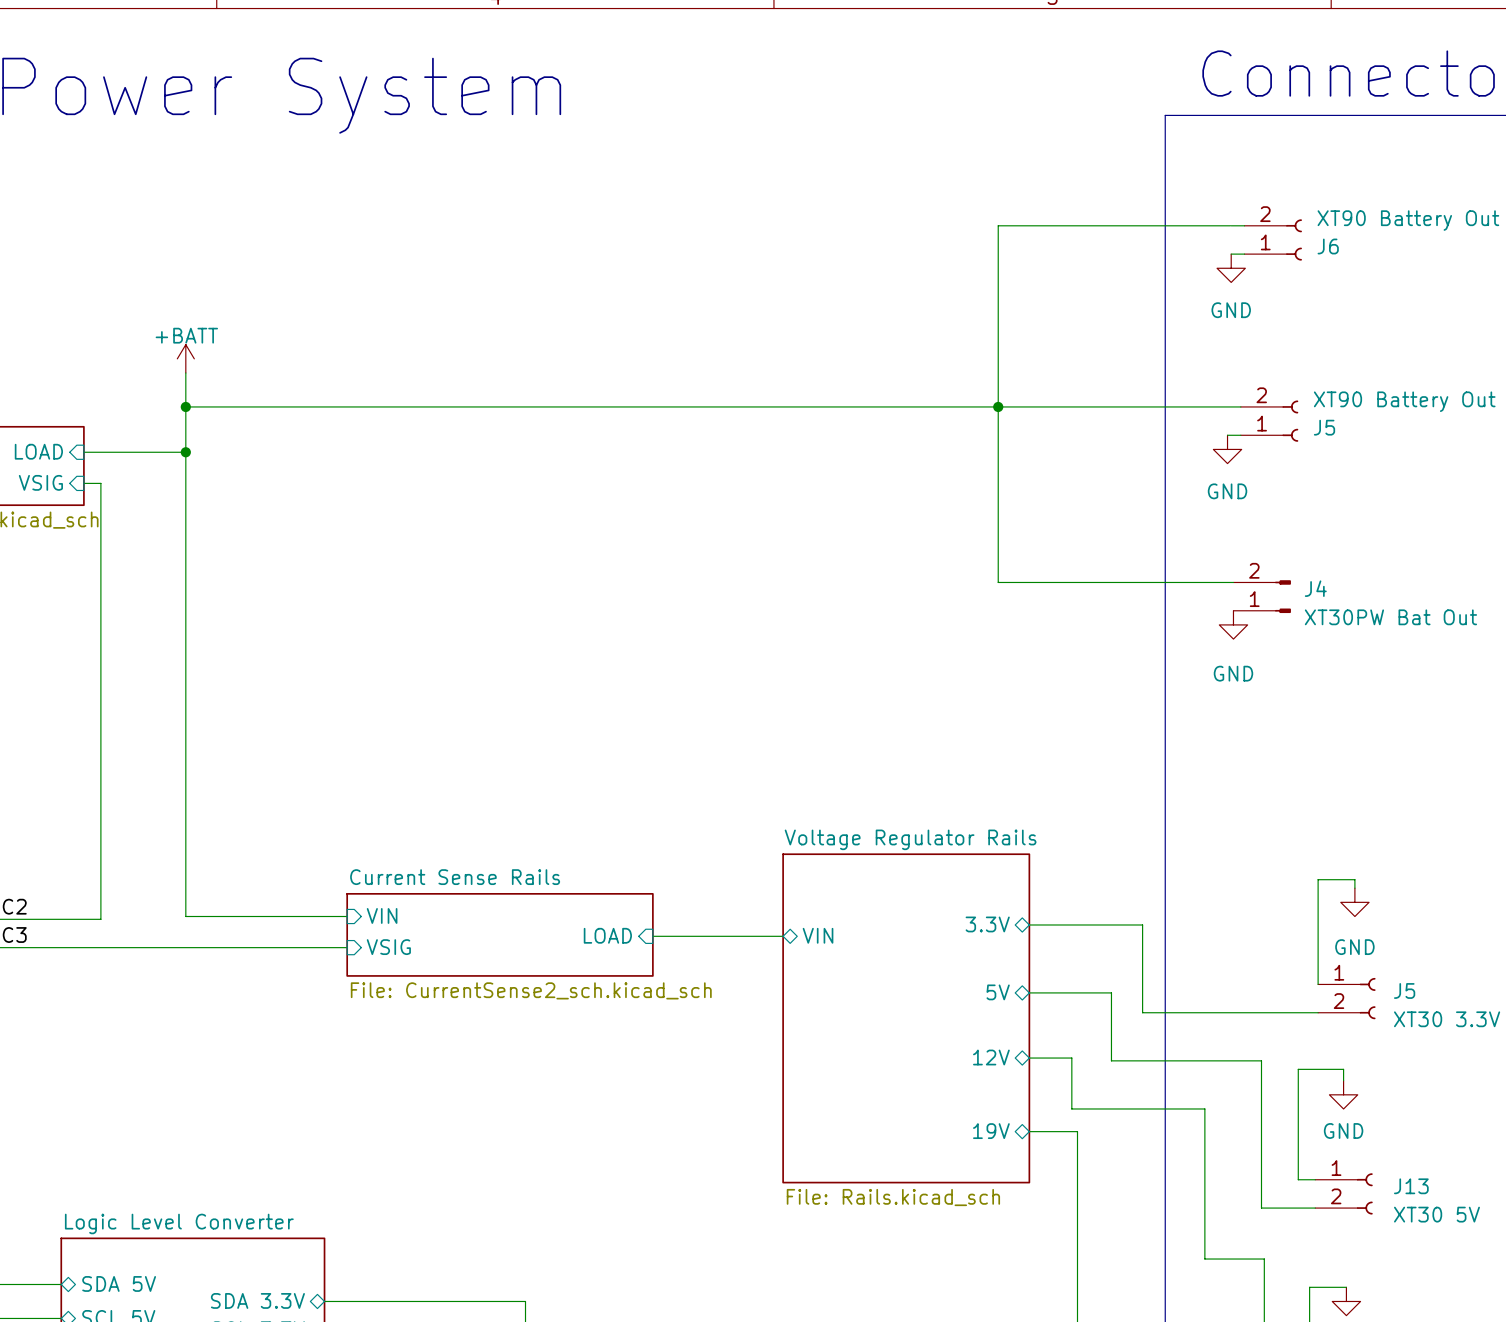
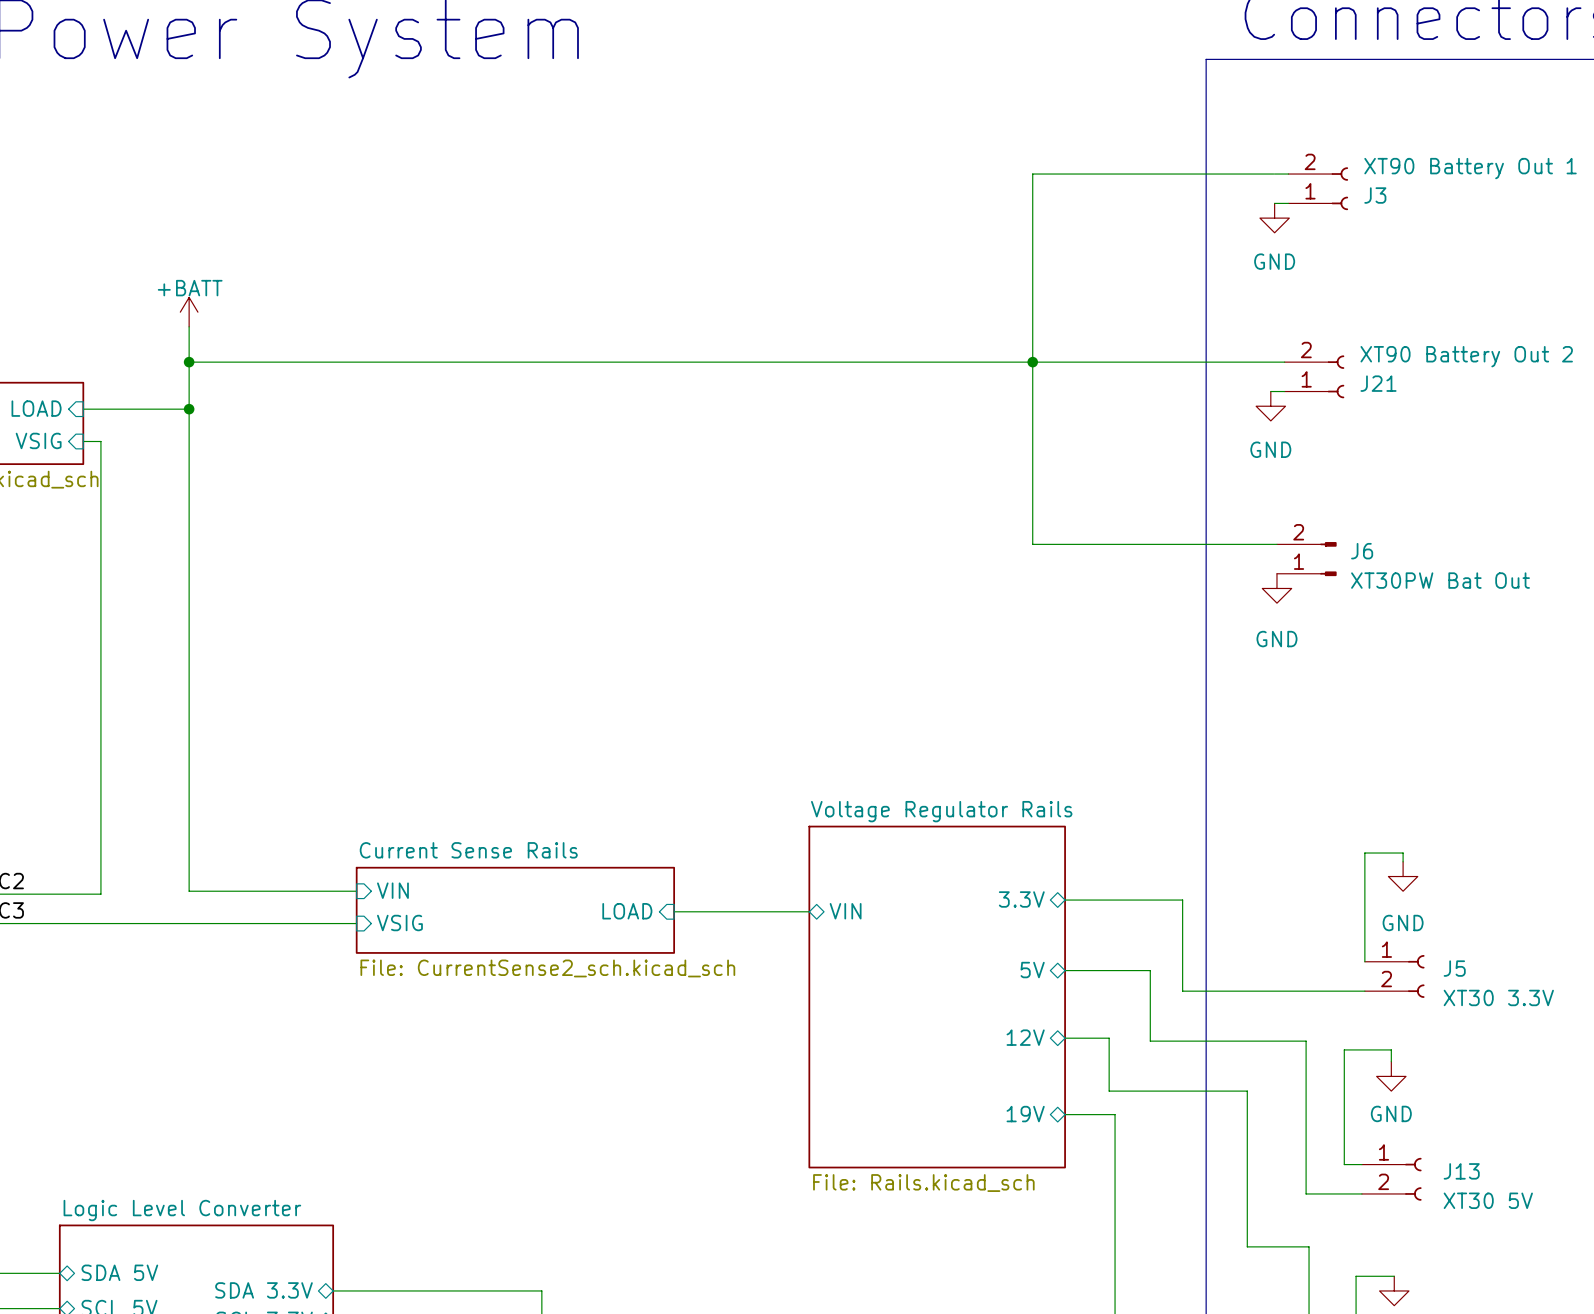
J6 name: J6 (1328, 246) -> J3 (1375, 195)
J5 name: J5 (1324, 427) -> J21 (1378, 383)
J4 name: J4 (1315, 588) -> J6 (1362, 551)

